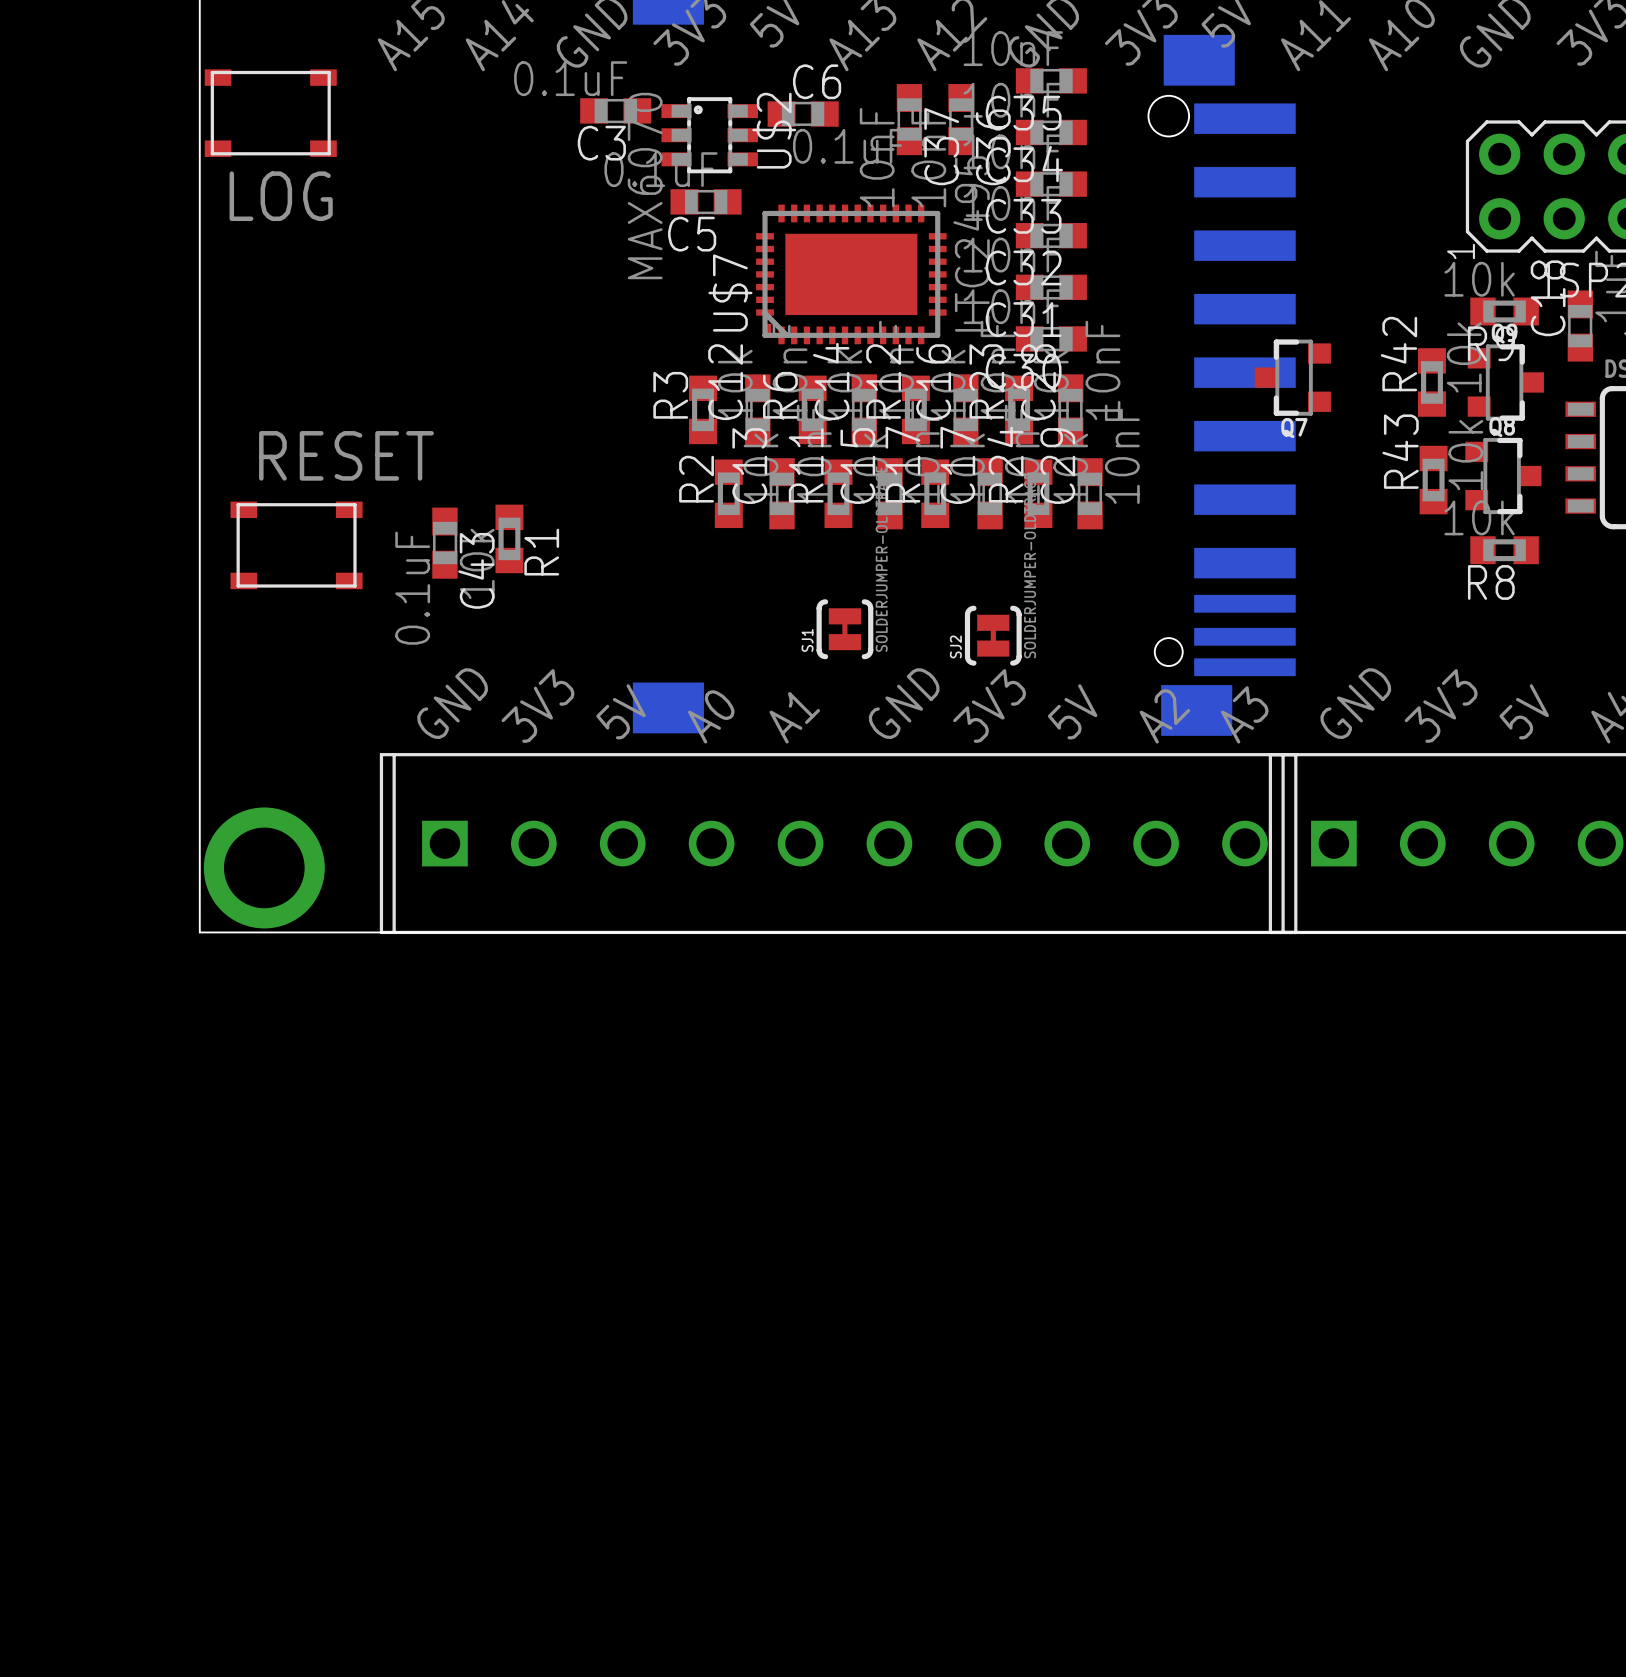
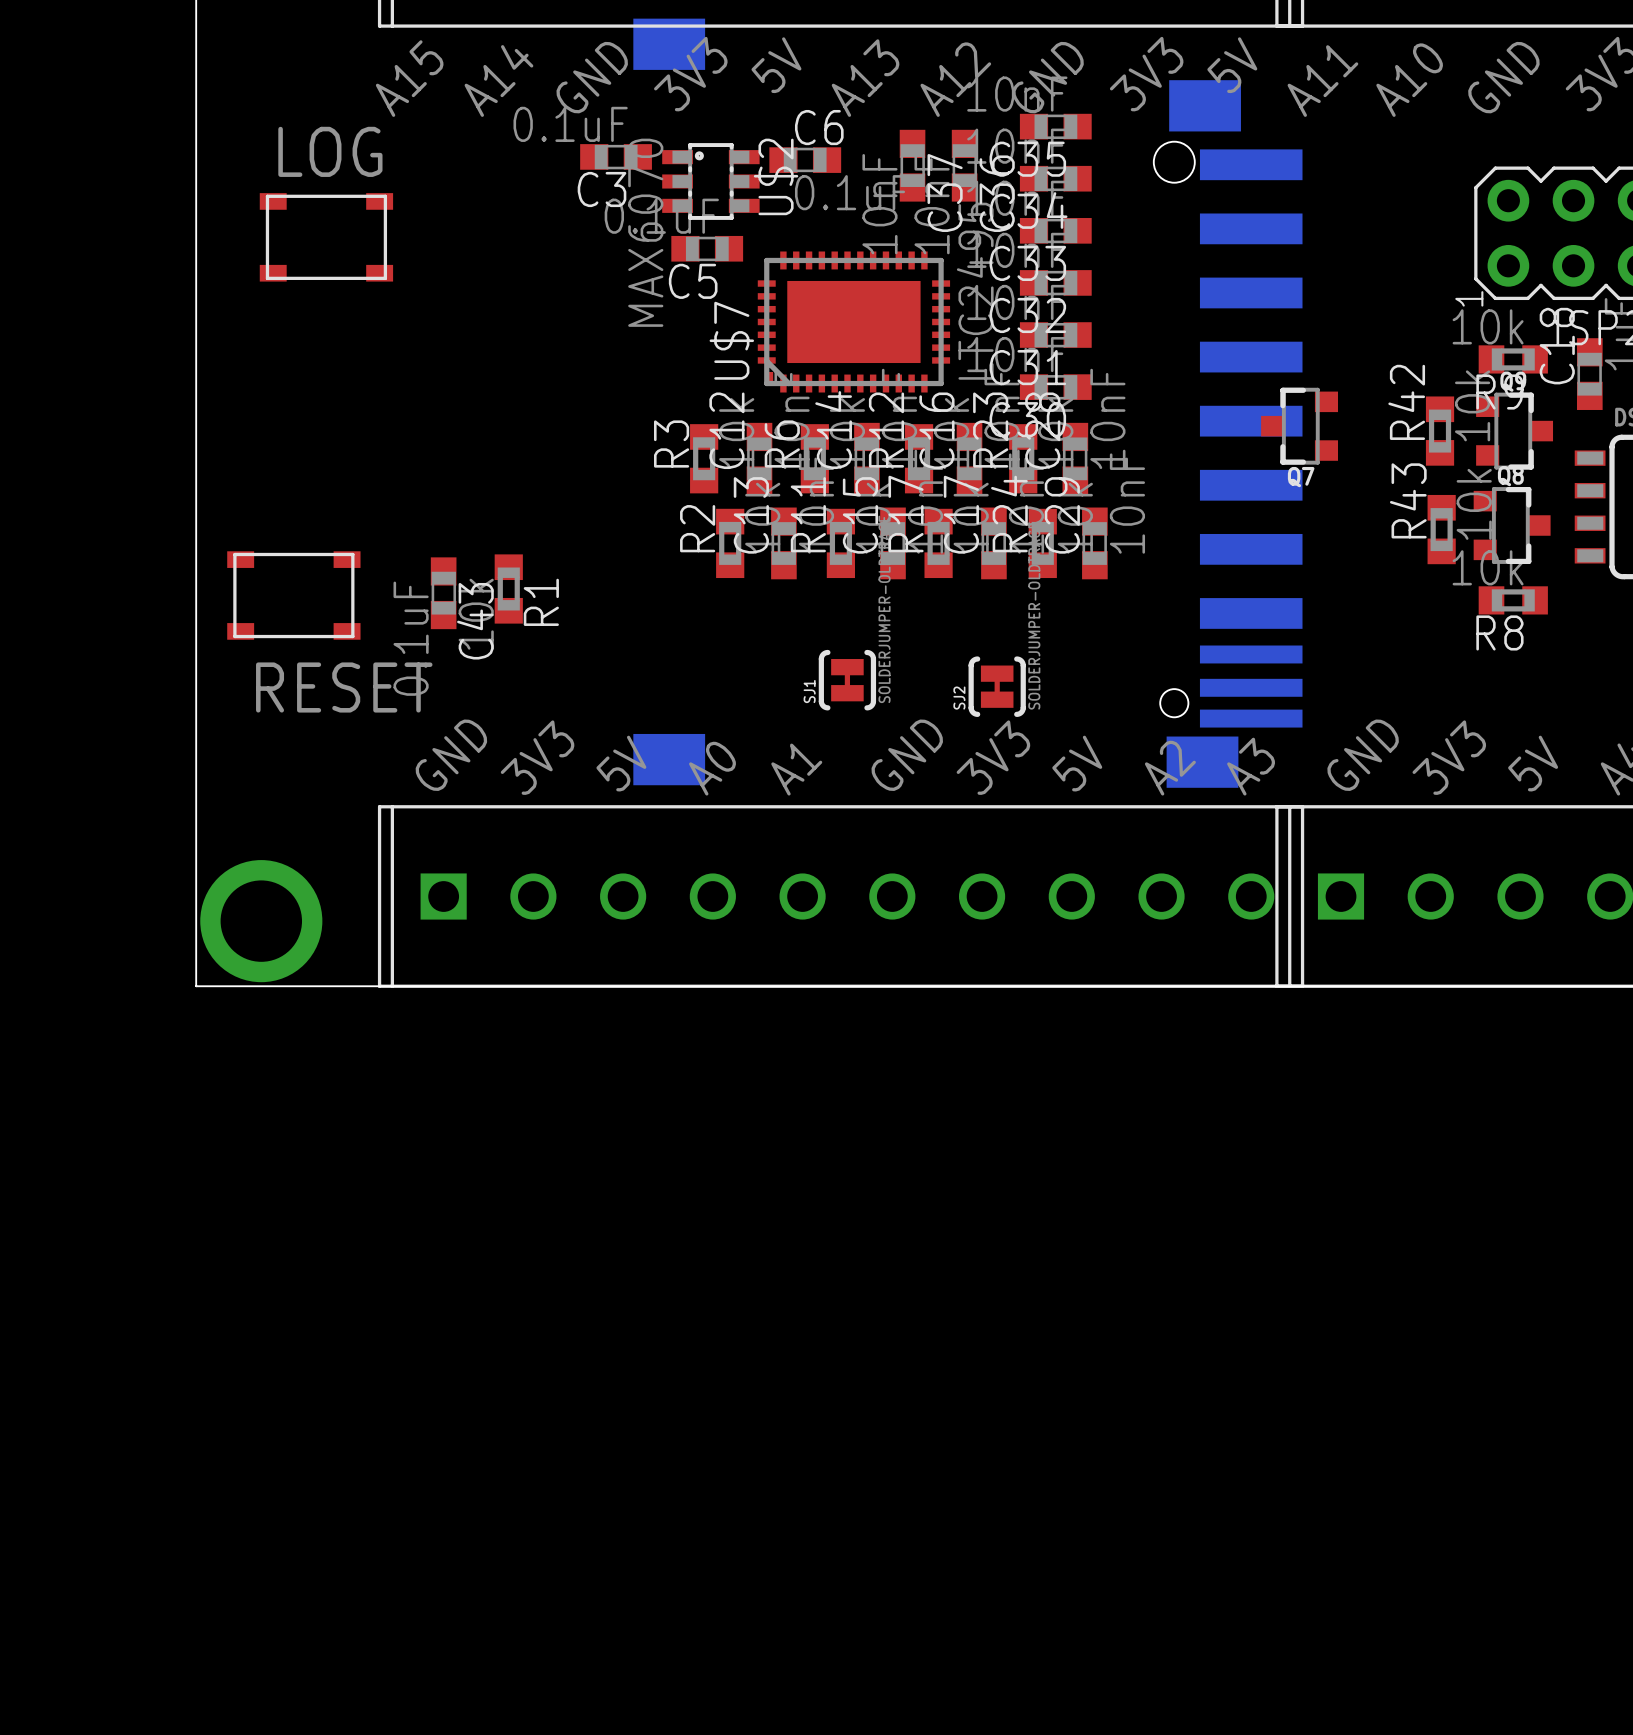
part position: (270, 113) -> (326, 237)
text position: LOG (281, 196) -> LOG (330, 151)
text position: RESET (346, 455) -> RESET (344, 687)

